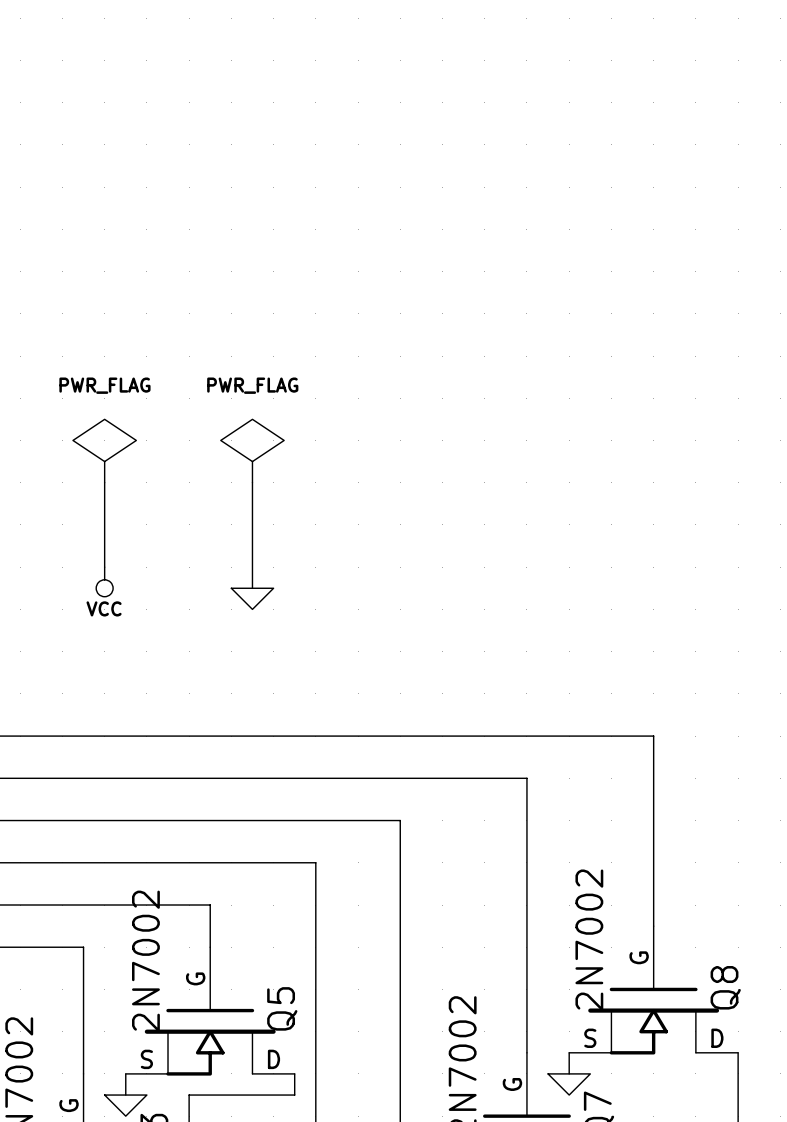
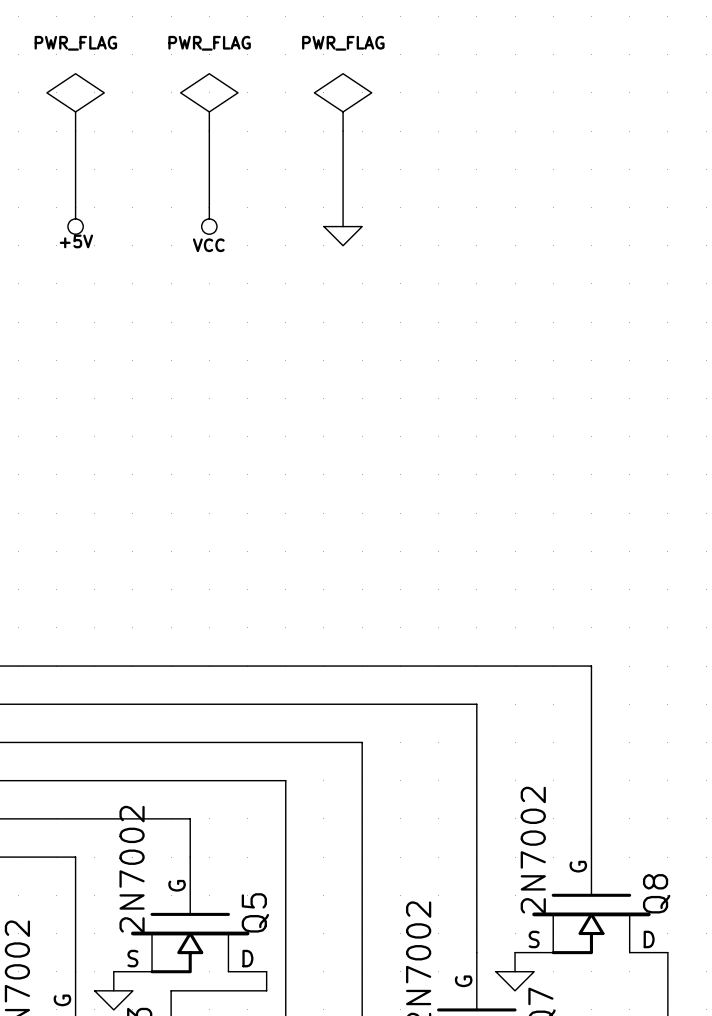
power symbol: none -> PWR_FLAG (75, 102)
power symbol: none -> PWR_FLAG (209, 102)
power symbol: none -> PWR_FLAG (343, 102)
wire: none -> (209, 131) (209, 207)
power symbol: none -> +5V (75, 220)
power symbol: PWR_FLAG (104, 451) -> none
power symbol: PWR_FLAG (252, 451) -> none
wire: (104, 482) (104, 567) -> (75, 131) (75, 207)
wire: (252, 482) (252, 588) -> (343, 131) (343, 226)
power symbol position: VCC (104, 581) -> VCC (209, 220)
power symbol position: (252, 598) -> (343, 236)

